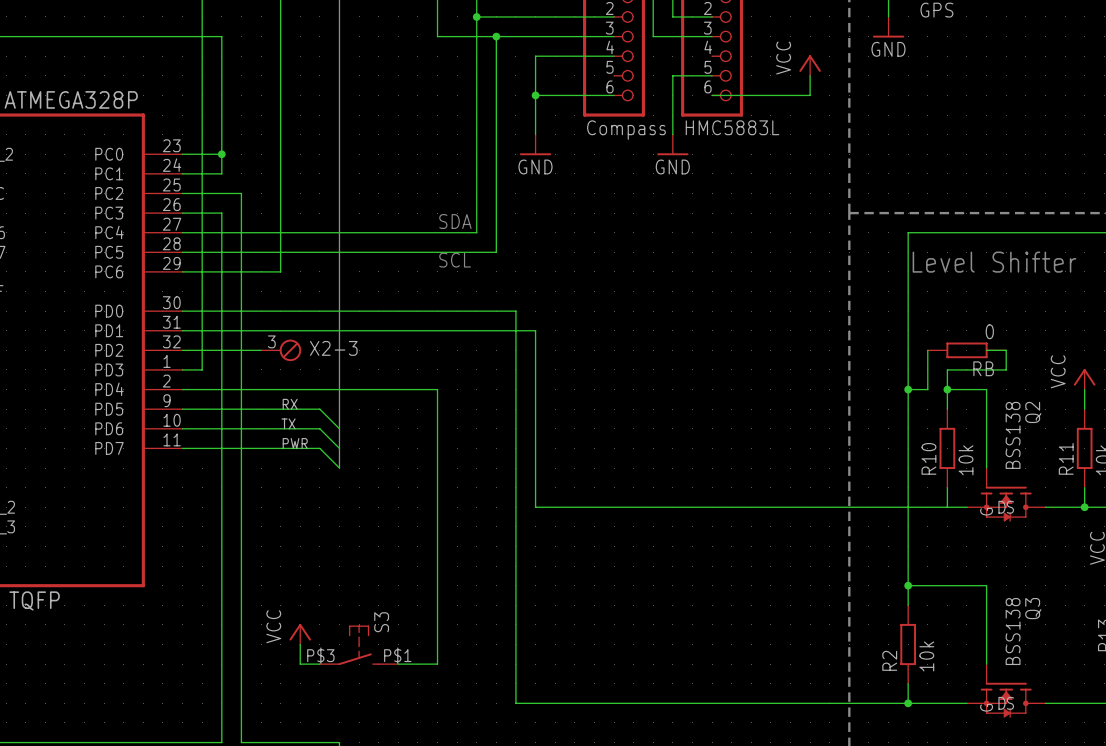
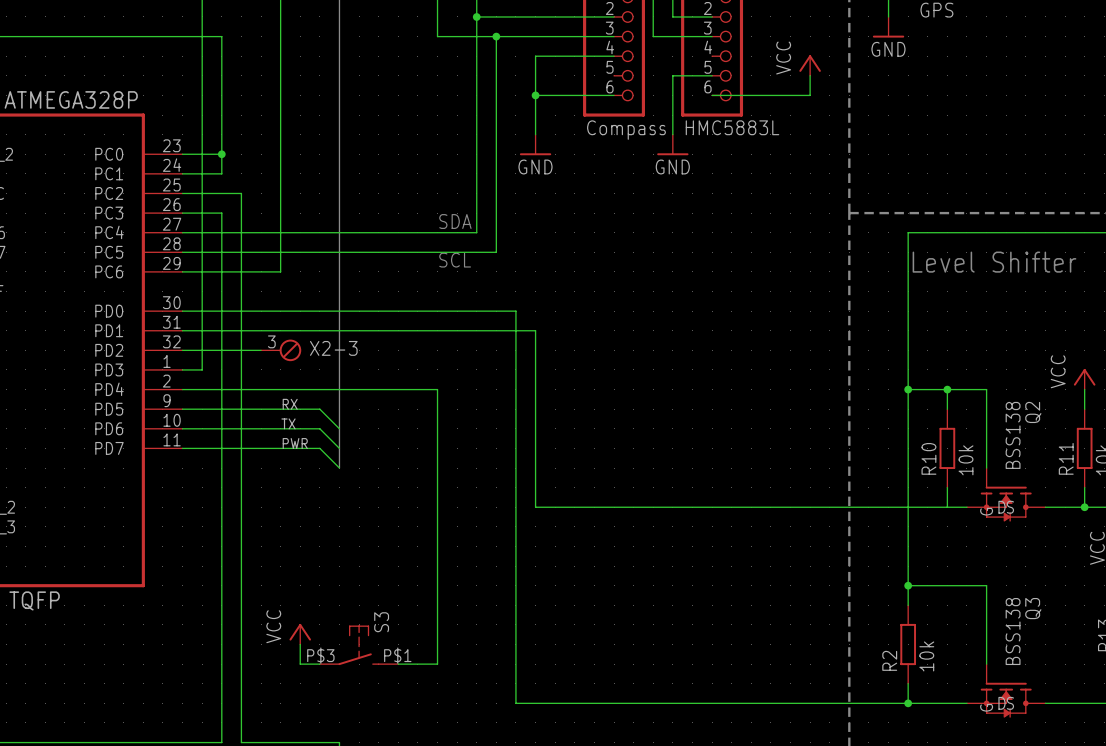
wire: (927, 350) (927, 389) -> (947, 389) (927, 389)
RB: 0 (966, 350) -> none
wire: (986, 350) (1006, 350) (1006, 369) (947, 369) (947, 389) -> none

